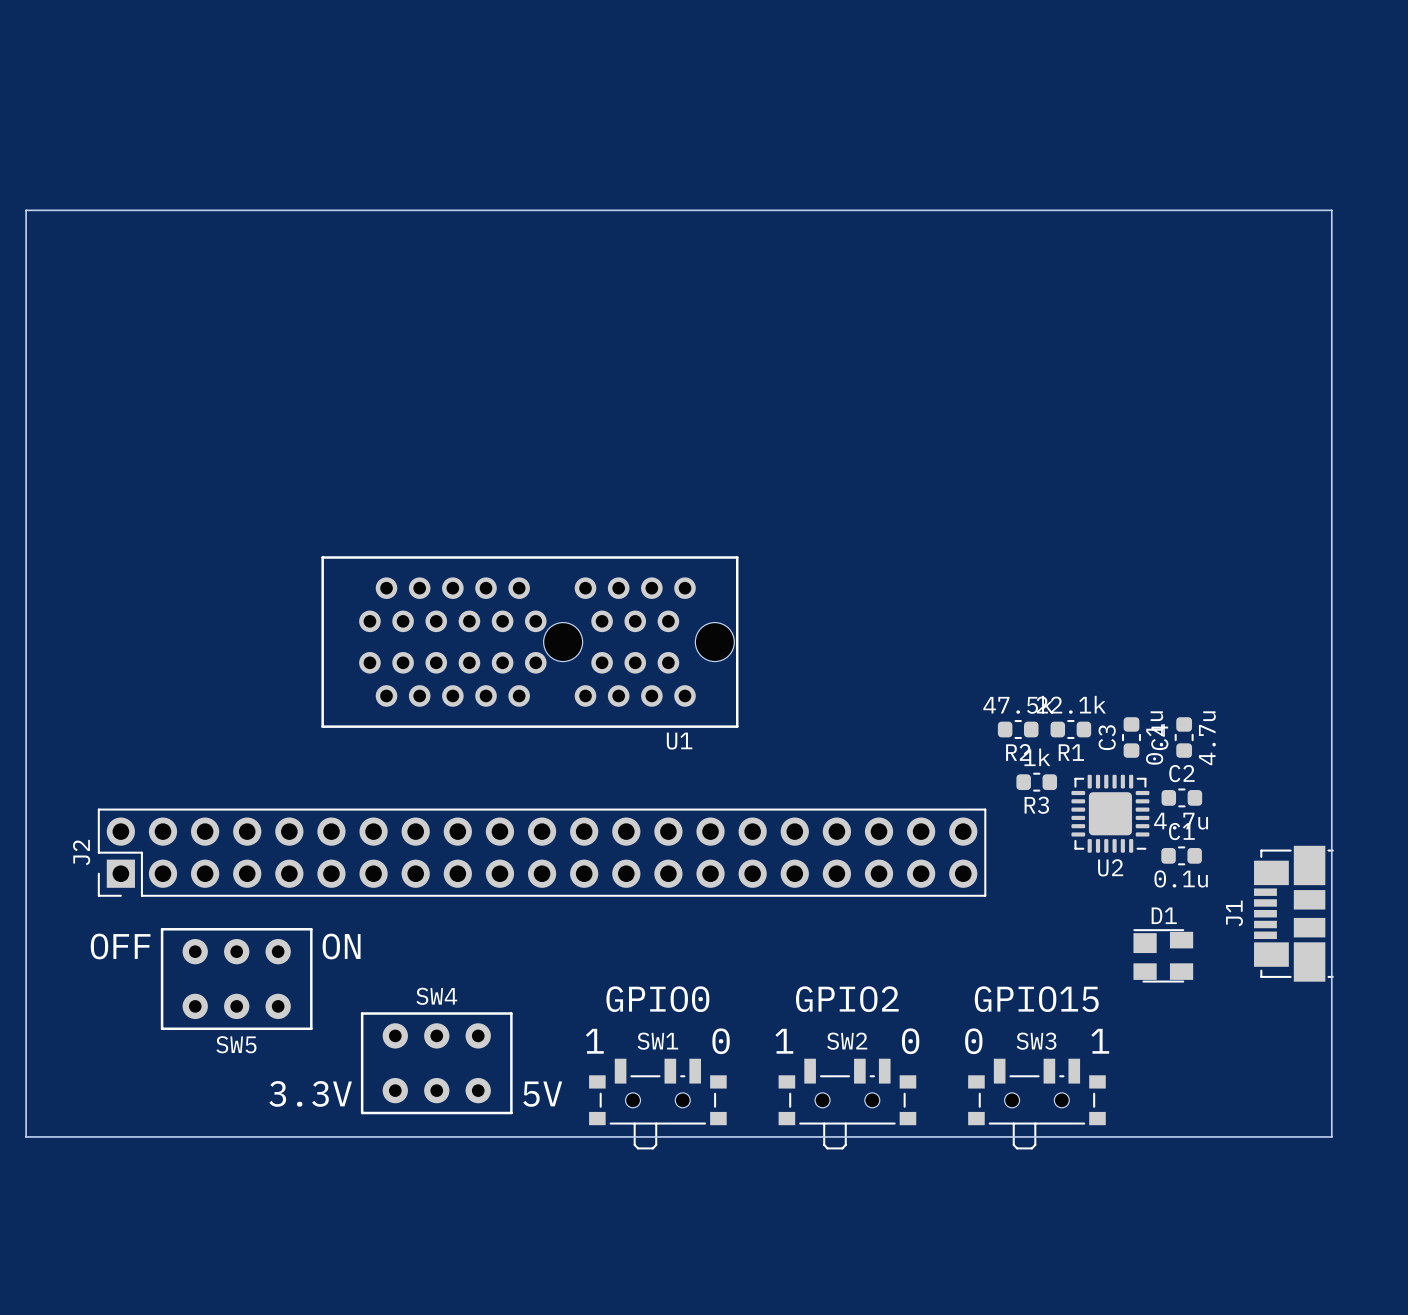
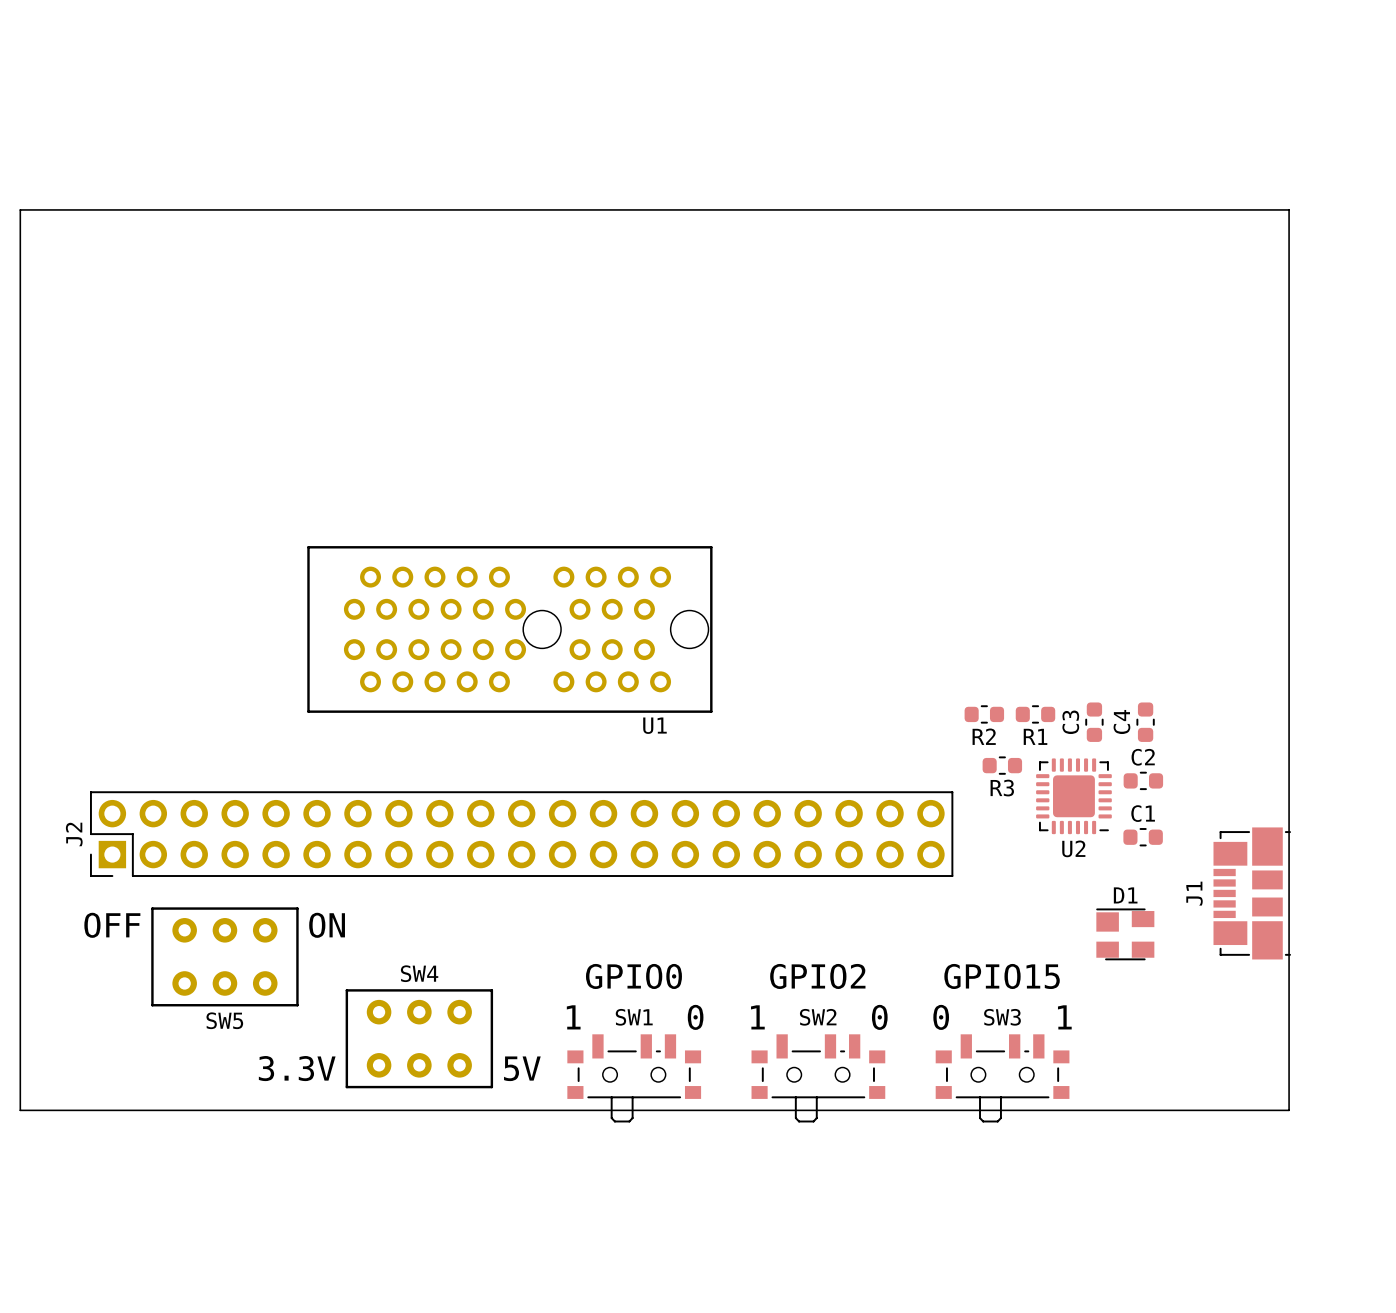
R2 value: 47.5k (1018, 704) -> none
R1 value: 22.1k (1071, 704) -> none
C3 value: 0.1u (1154, 738) -> none
C4 value: 4.7u (1207, 738) -> none
R3 value: 1k (1037, 757) -> none
C2 value: 4.7u (1181, 821) -> none
C1 value: 0.1u (1181, 878) -> none

